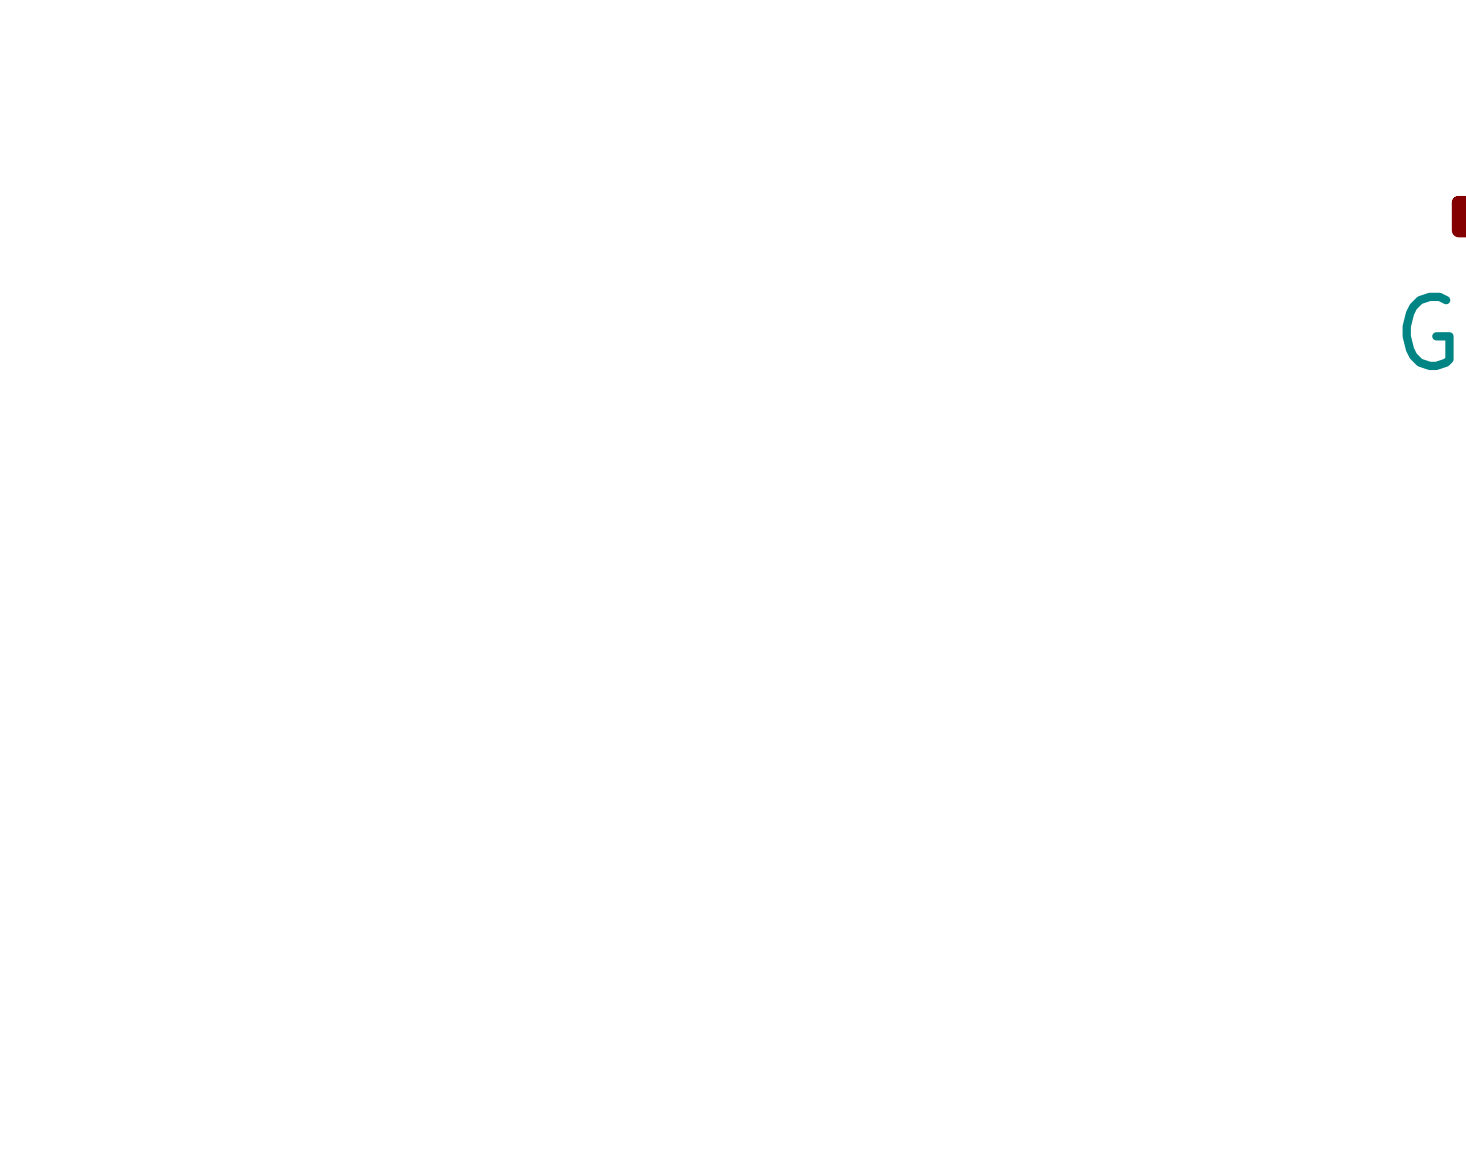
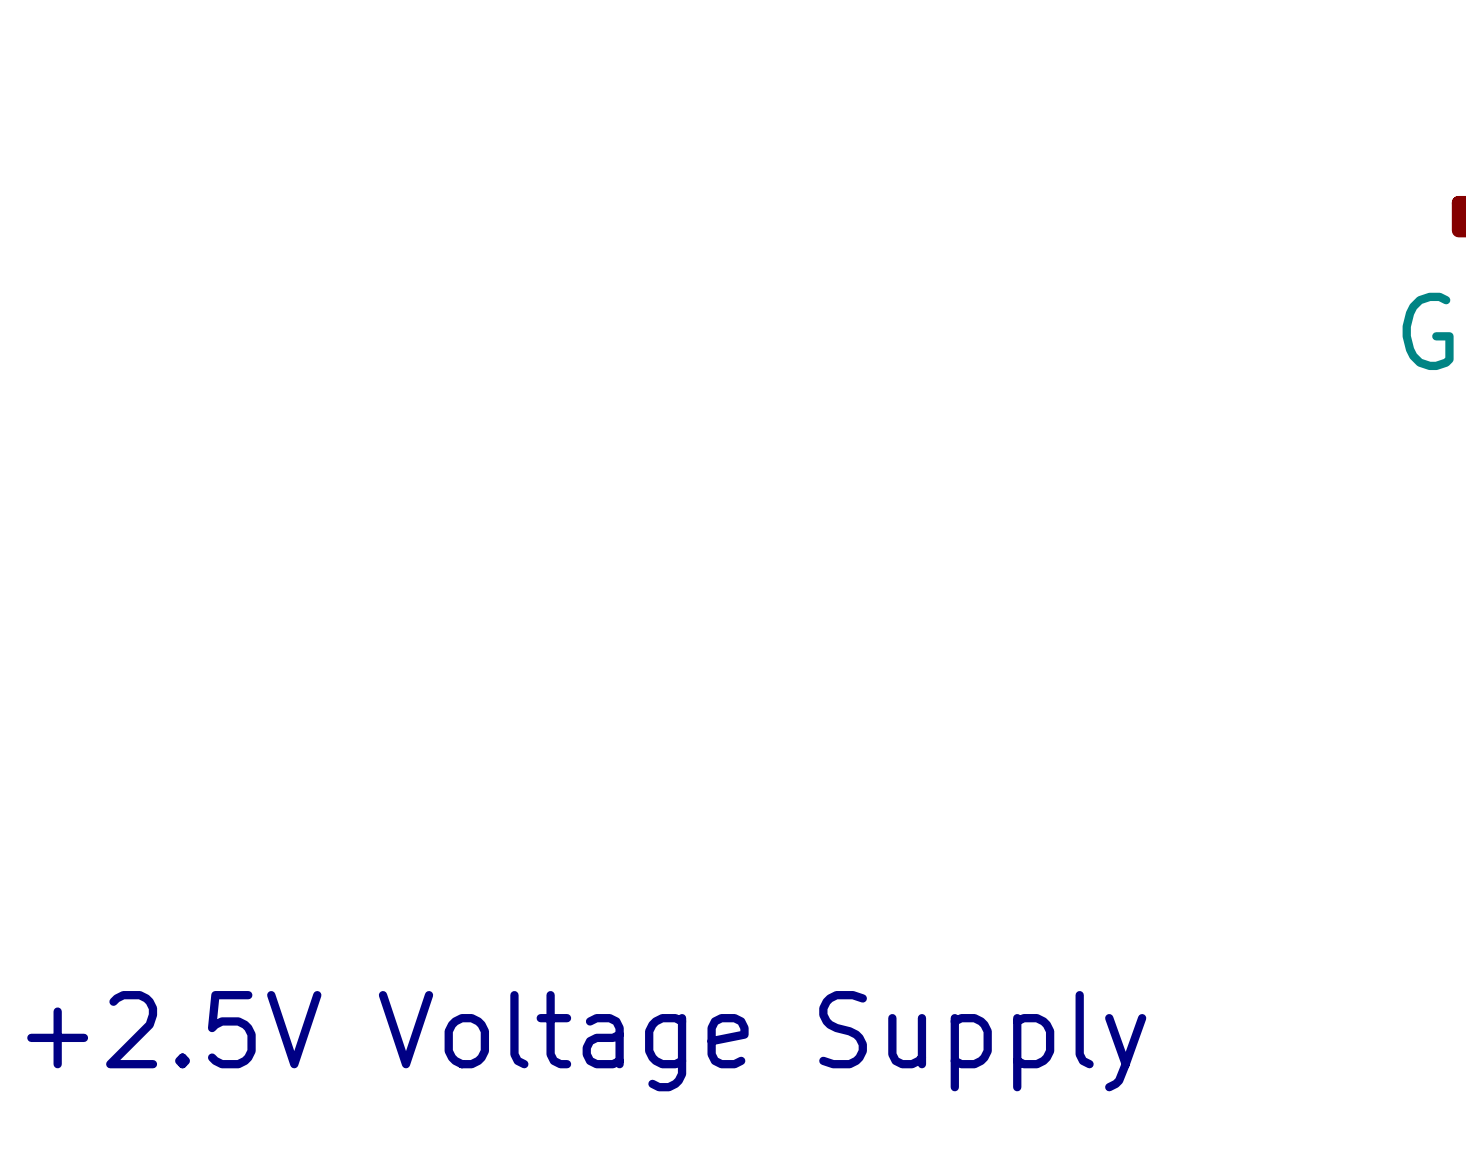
text: none -> +2.5V Voltage Supply (586, 1041)

